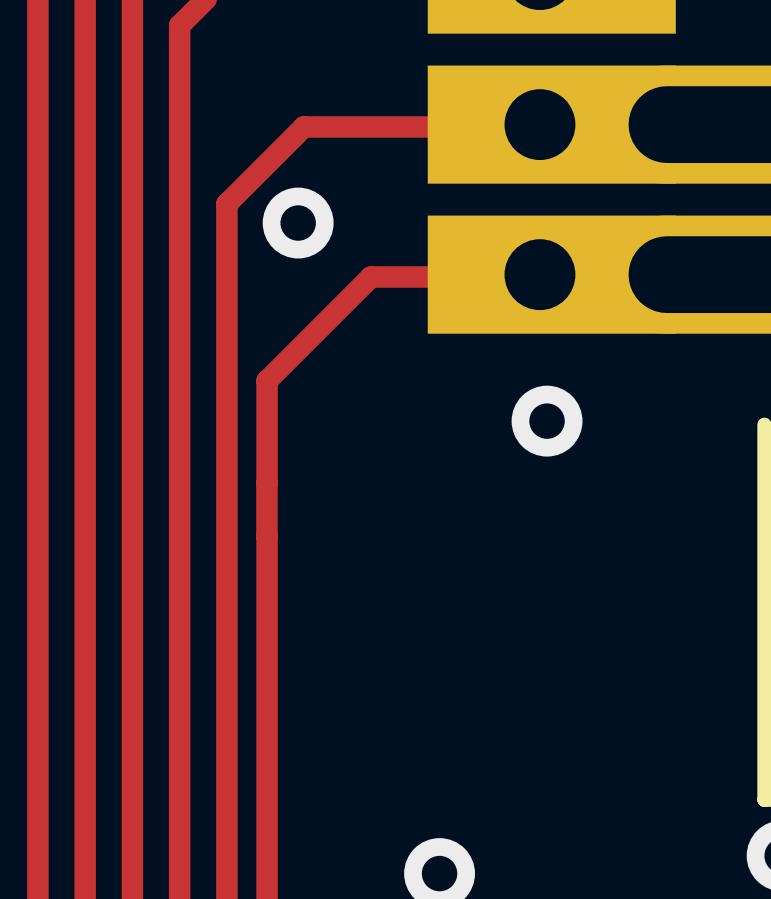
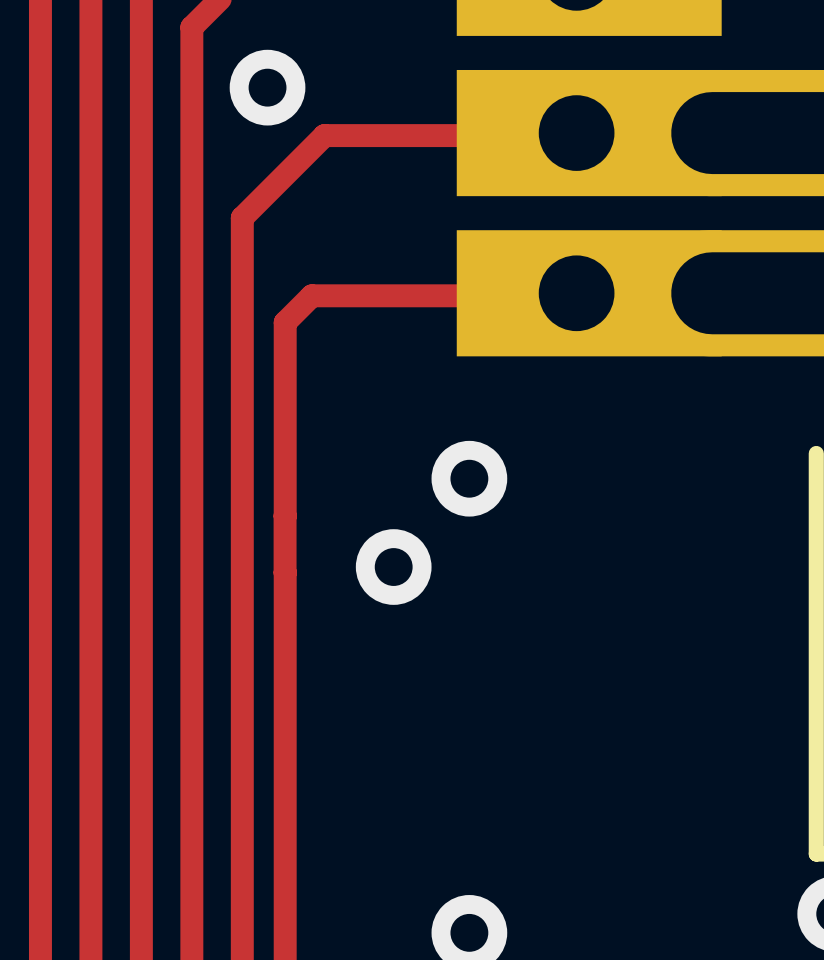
via: none -> (267, 87)
via: (298, 223) -> none
track: (371, 277) (267, 380) -> (396, 295) (311, 295) (285, 322) (285, 406)
via: (547, 421) -> none
via: none -> (469, 478)
via: none -> (393, 567)

